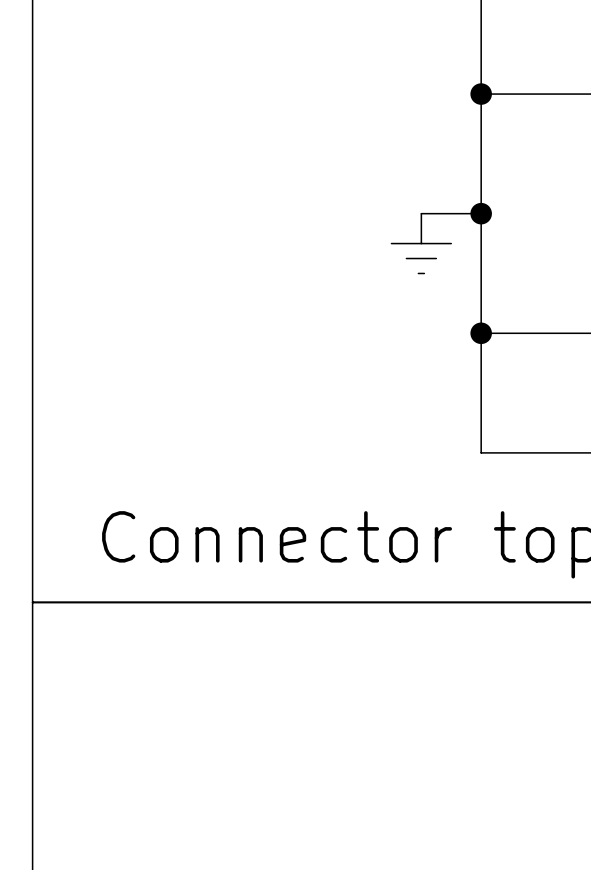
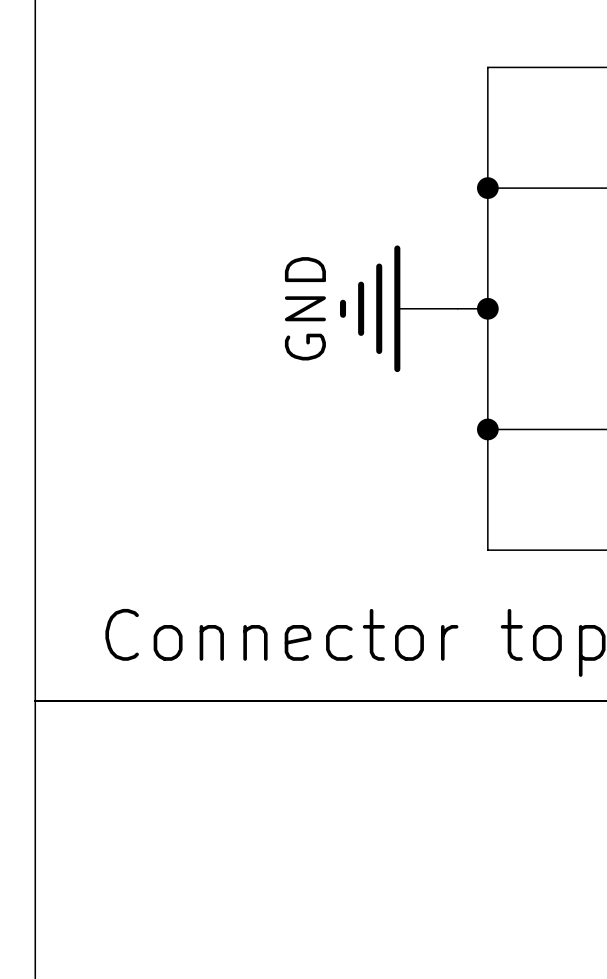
power symbol: none -> GND (398, 308)
power symbol: (421, 243) -> none

